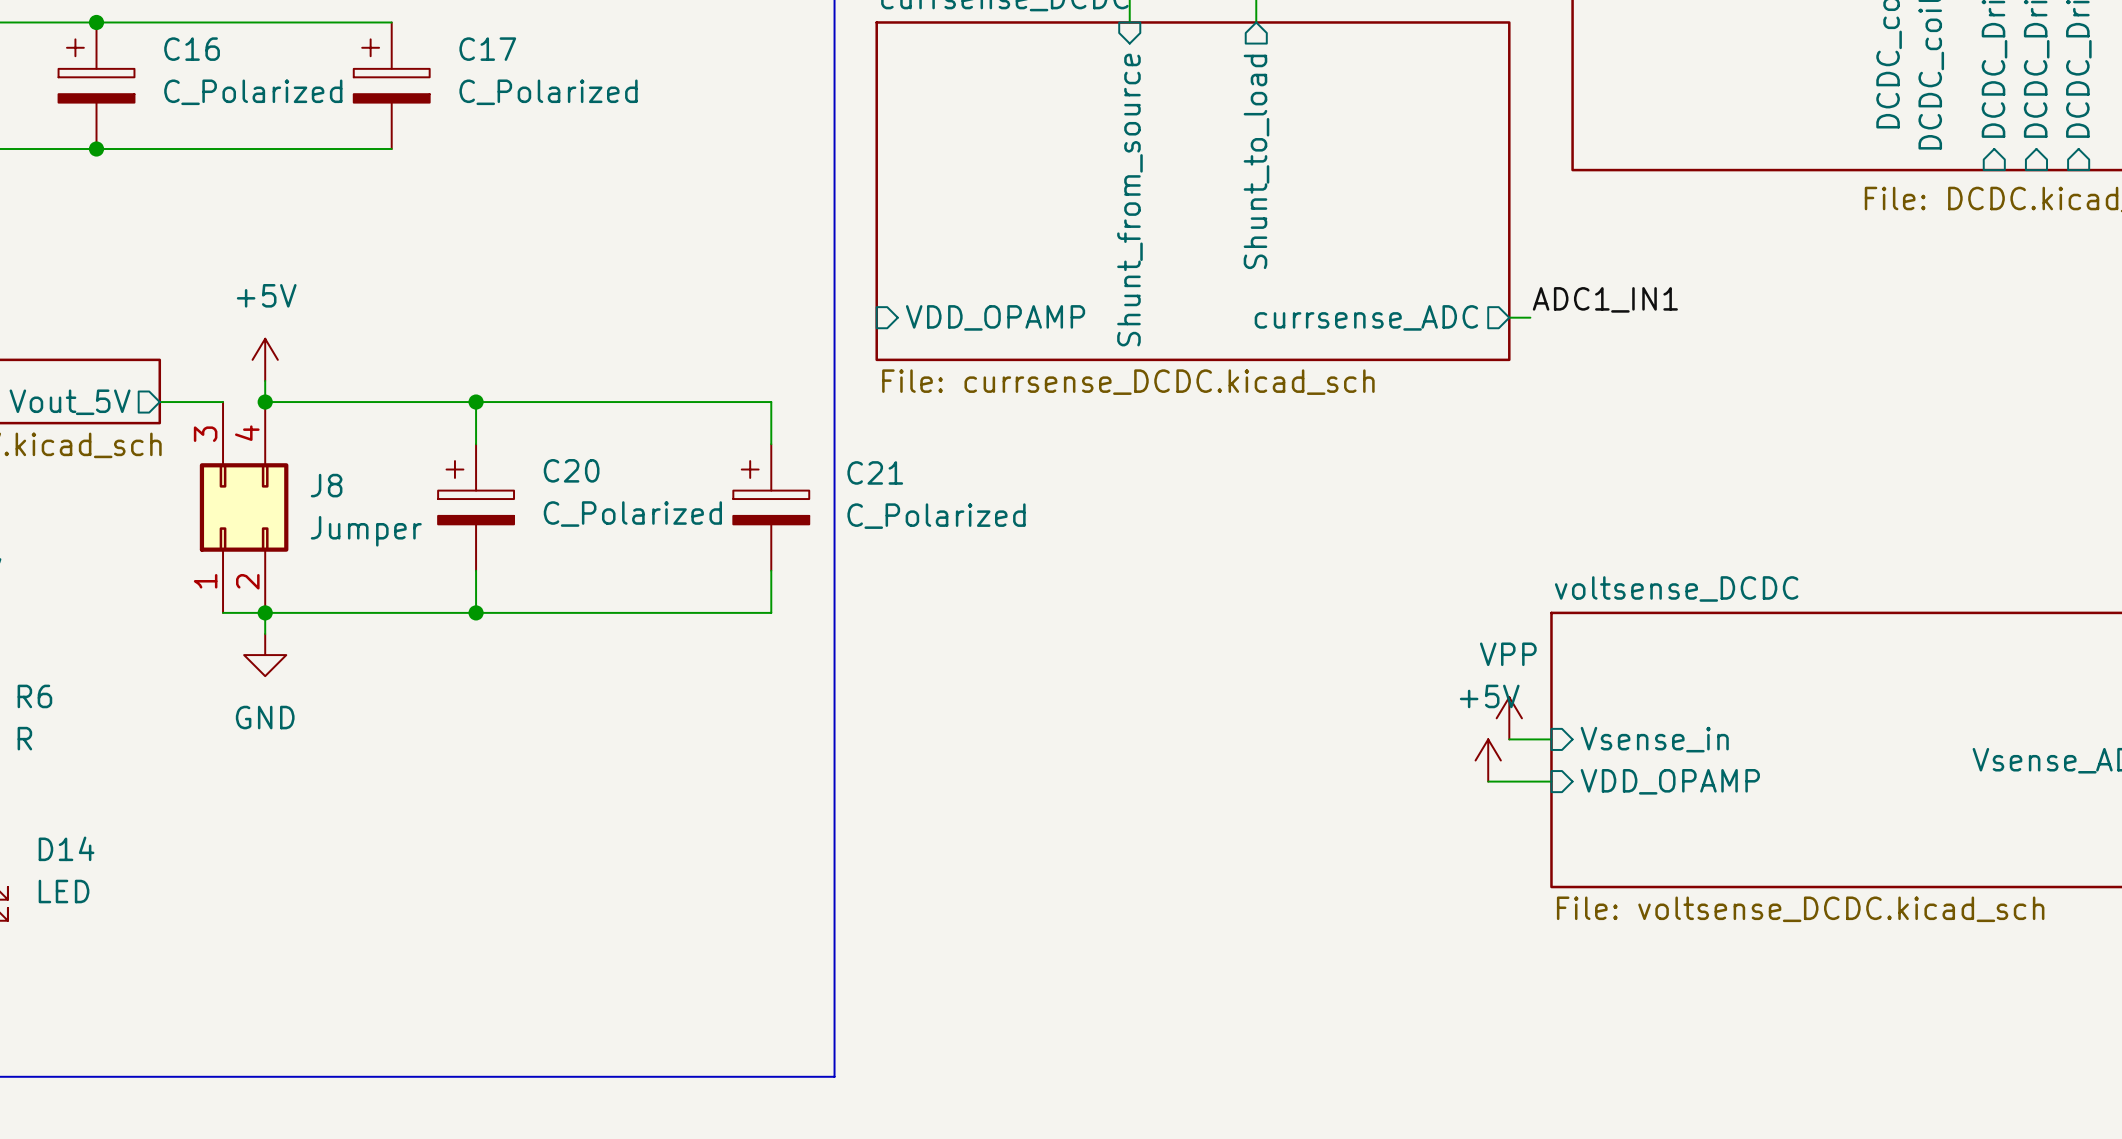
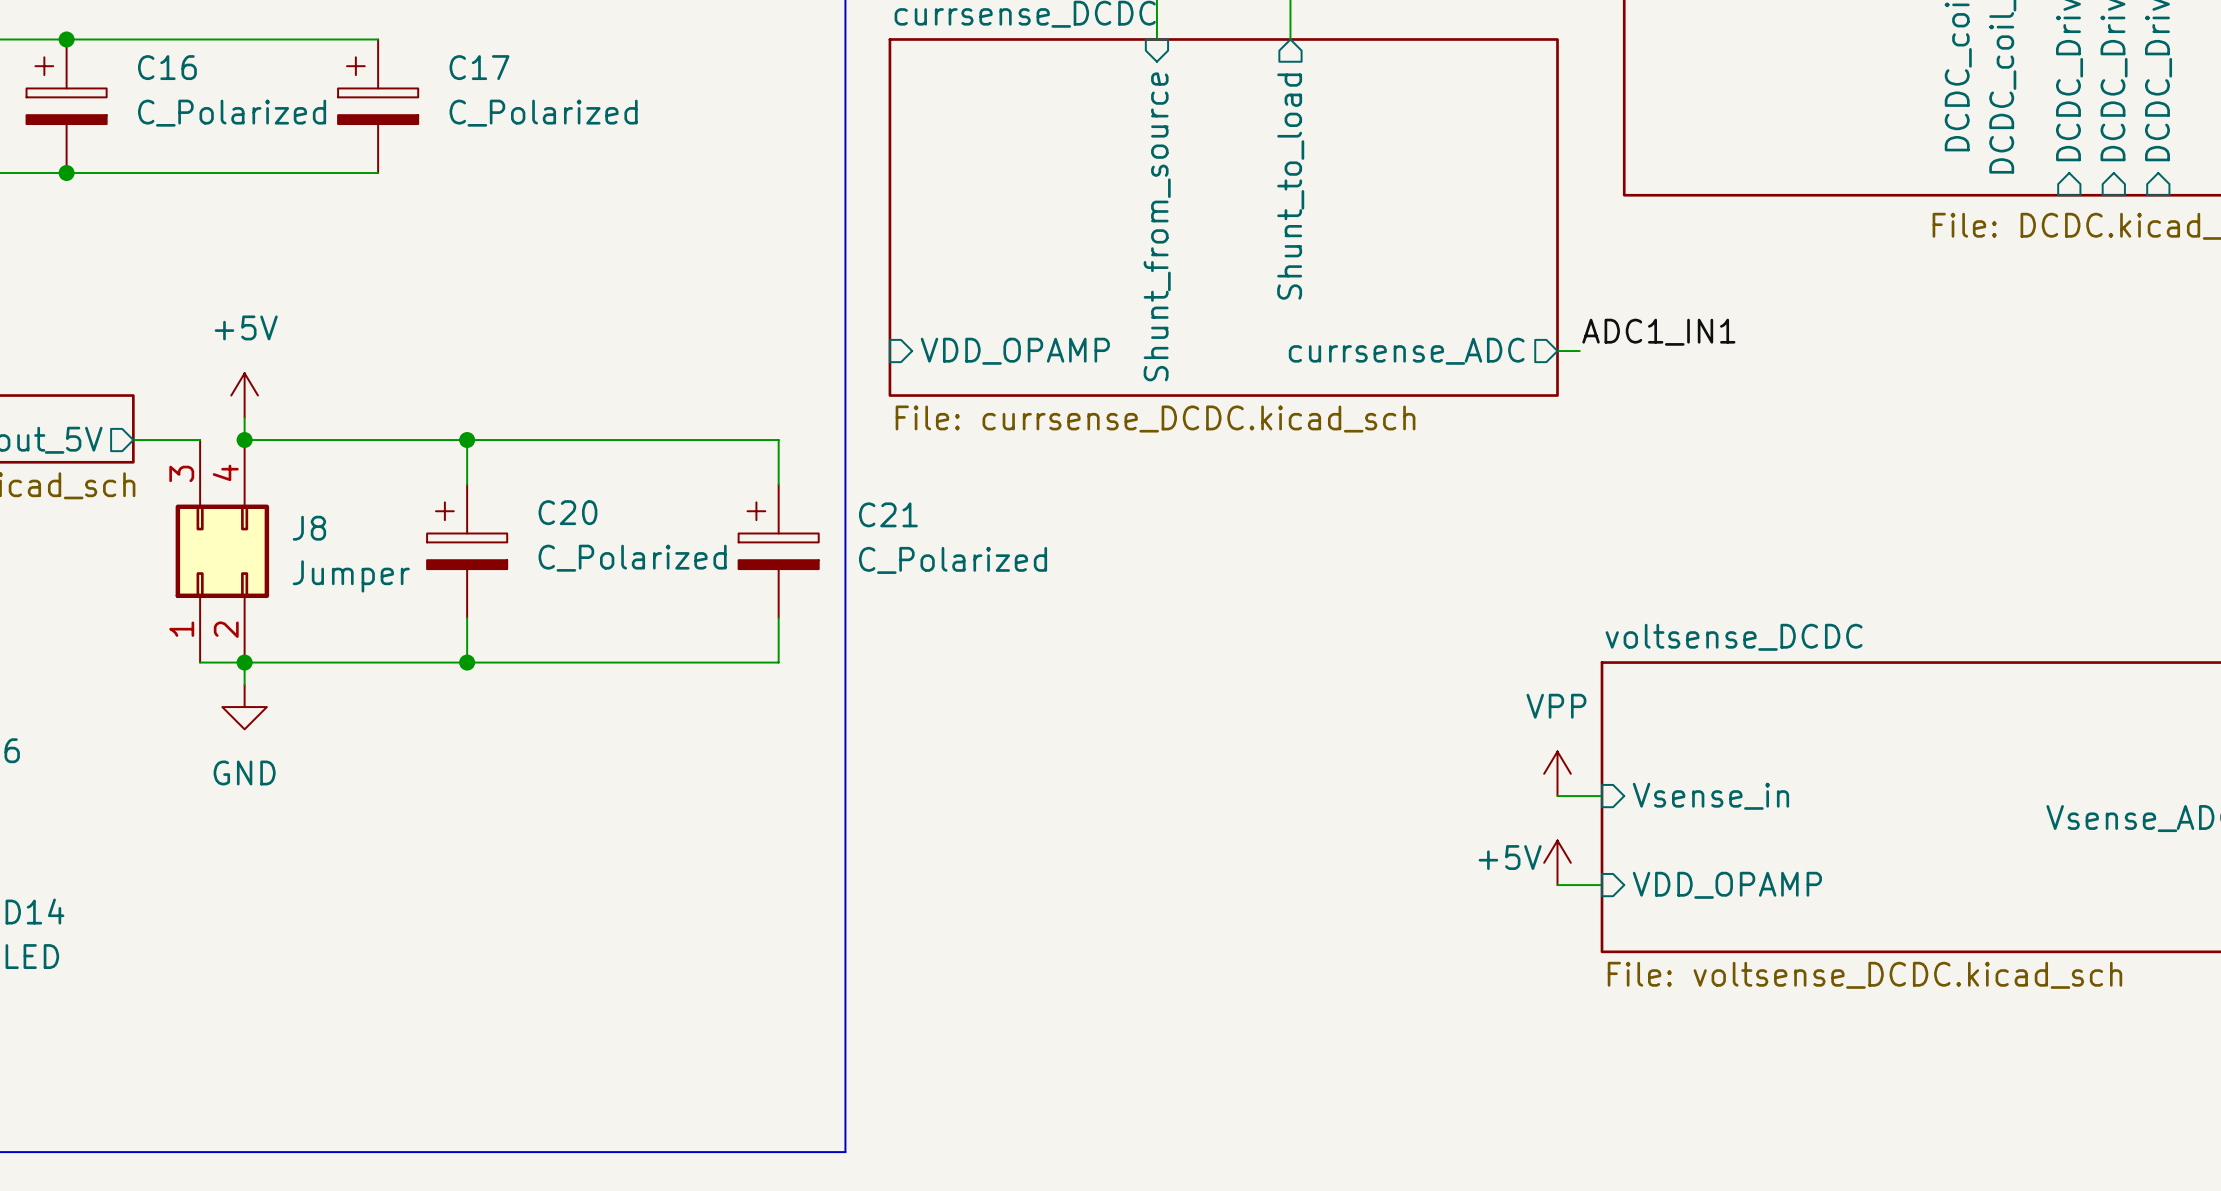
power symbol text position: +5V (1489, 696) -> +5V (1510, 857)
power symbol position: +5V (1488, 760) -> +5V (1557, 862)
wire: (1488, 781) (1551, 781) -> none
sheet pin position: VDD_OPAMP (1670, 781) -> VDD_OPAMP (1727, 885)
wire: none -> (1557, 885) (1602, 885)

